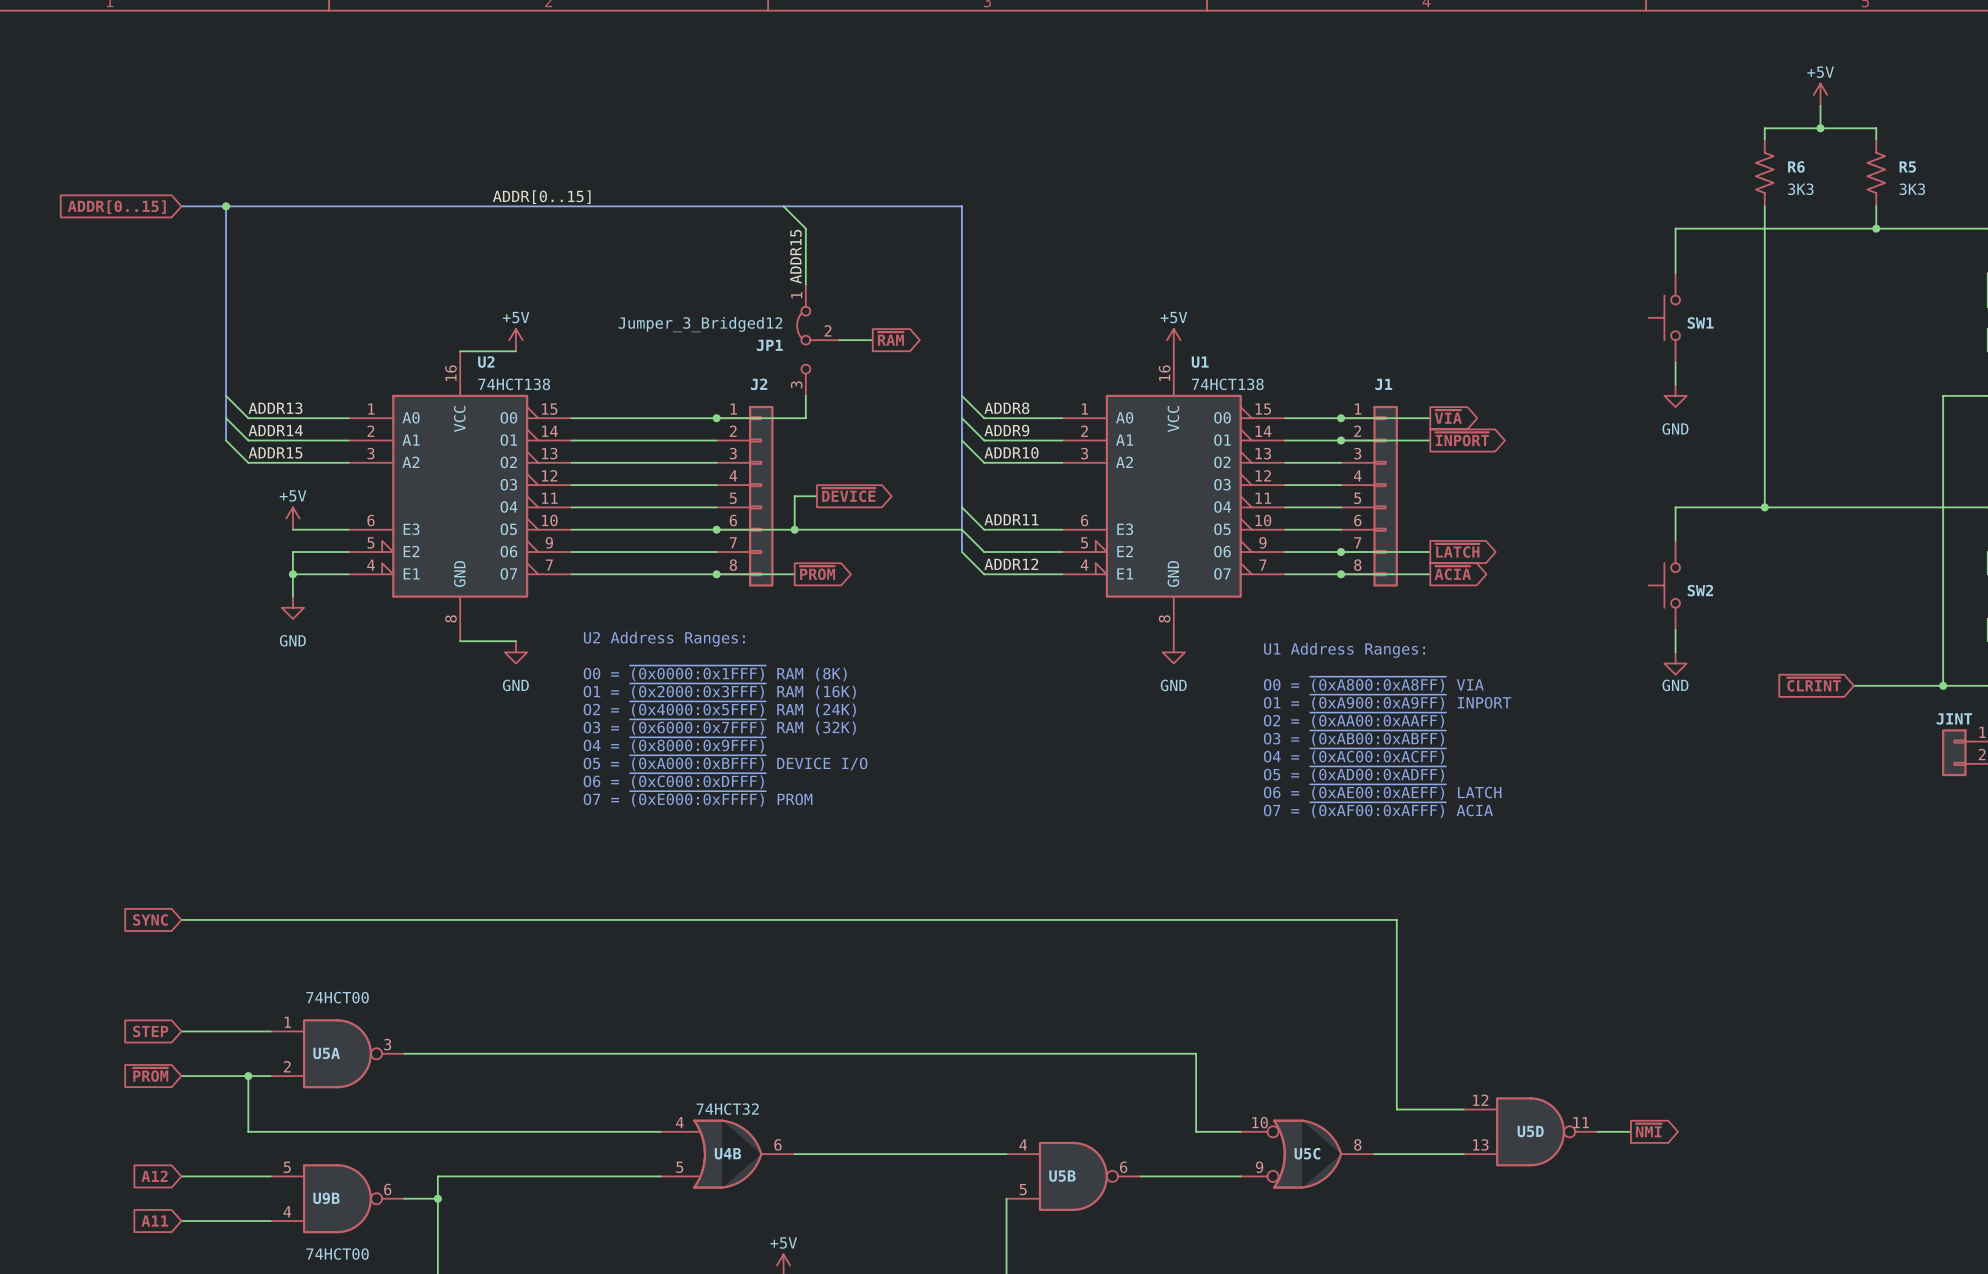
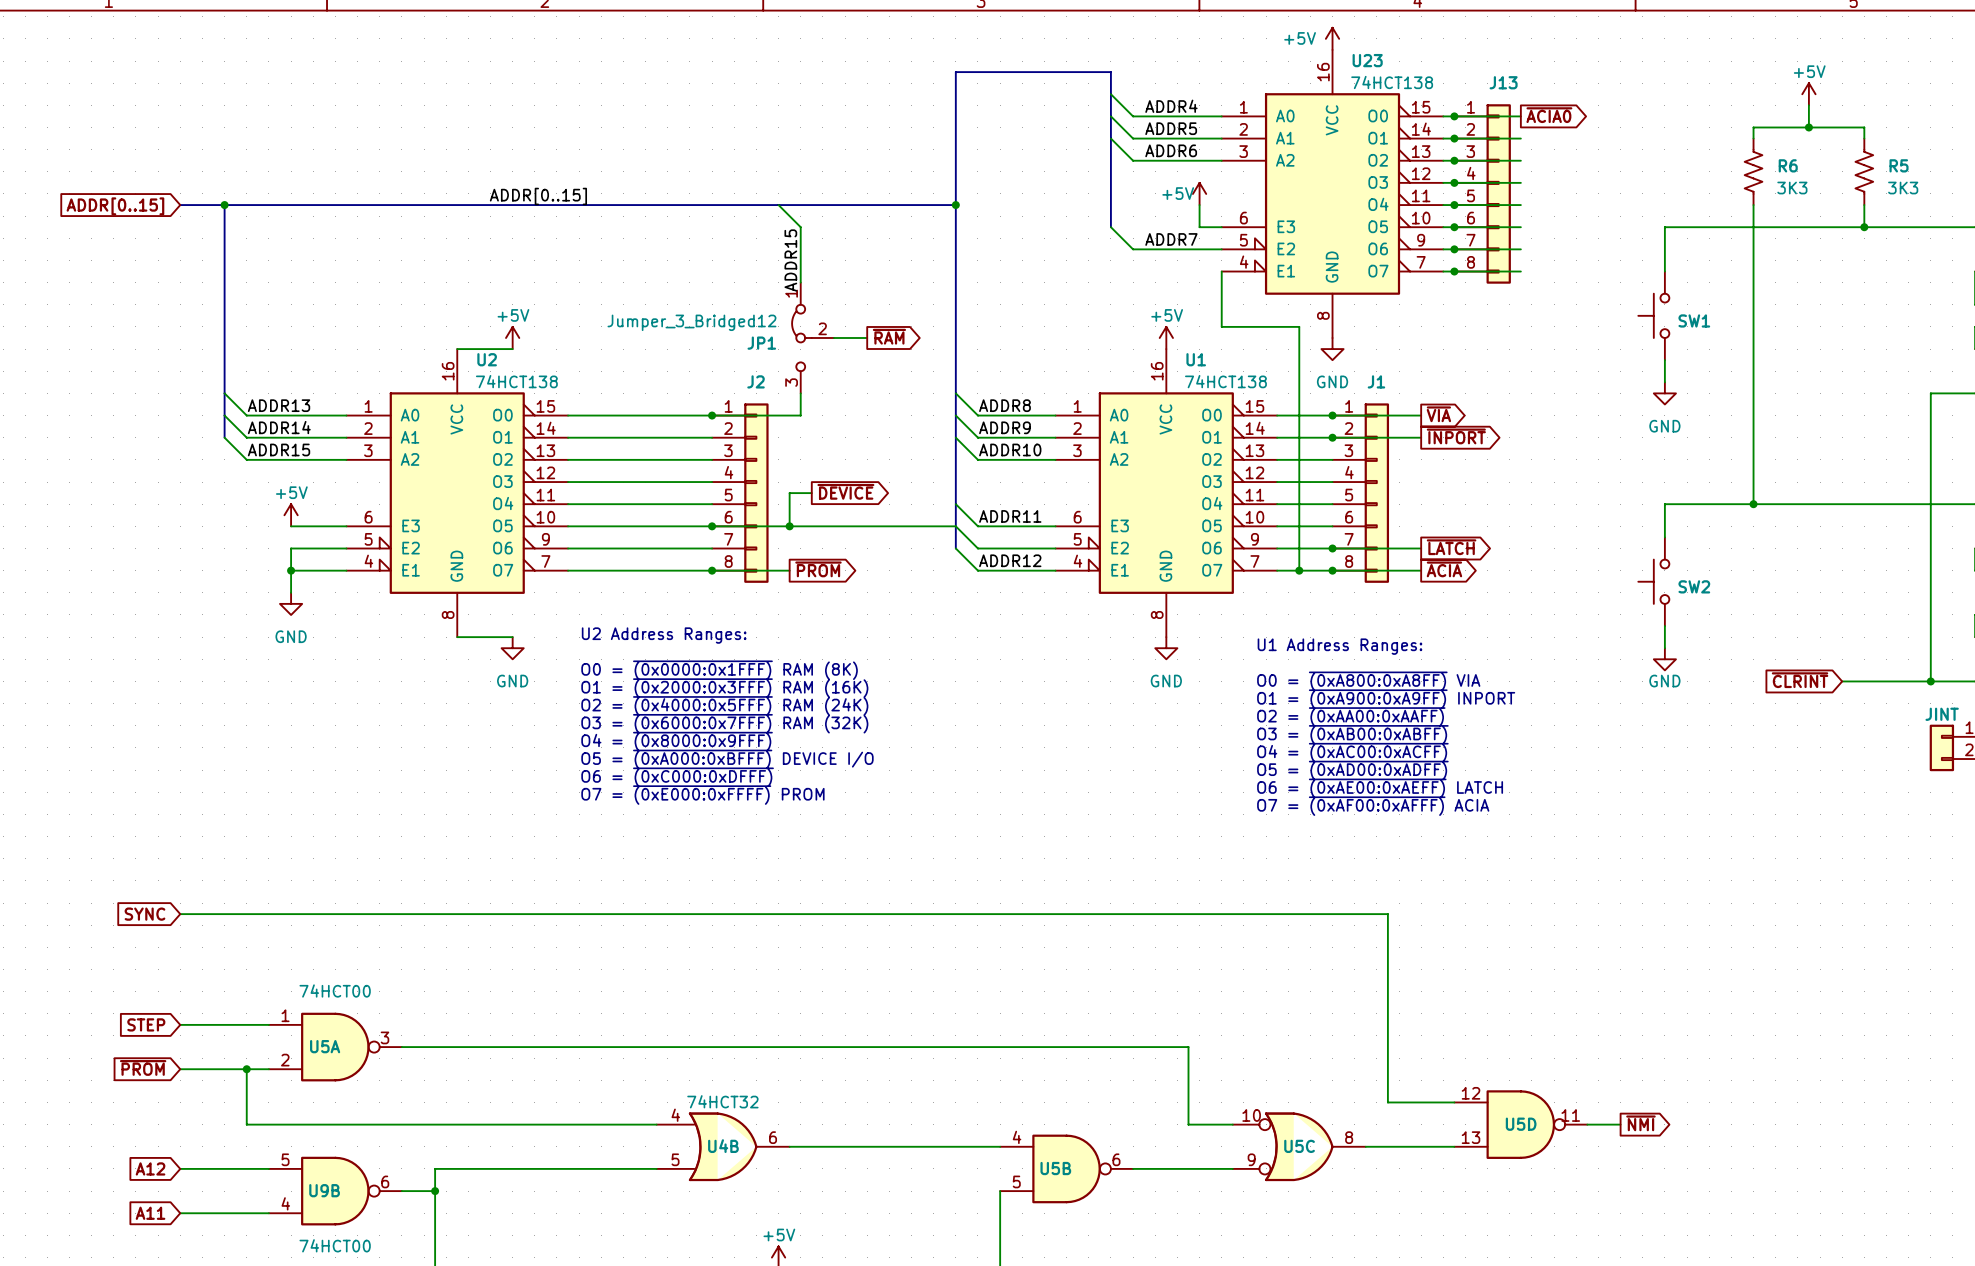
power symbol: none -> +5V (1332, 38)
wire: none -> (1110, 94) (1133, 116) (1221, 116)
label: none -> ADDR4 (1171, 106)
global label: none -> ~{ACIA0} (1549, 115)
wire: none -> (1110, 116) (1133, 138) (1221, 138)
wire: none -> (1443, 116) (1520, 116)
junction: none -> (1454, 116)
label: none -> ADDR5 (1171, 128)
wire: none -> (1110, 138) (1133, 160) (1221, 160)
wire: none -> (1443, 138) (1520, 138)
junction: none -> (1454, 138)
label: none -> ADDR6 (1171, 150)
wire: none -> (1443, 160) (1520, 160)
junction: none -> (1454, 160)
wire: none -> (1443, 182) (1520, 182)
junction: none -> (1454, 182)
power symbol: none -> +5V (1199, 193)
U23: none -> 74HCT138 (1332, 193)
J13: none -> (1482, 193)
bus: none -> (955, 205) (955, 72) (1110, 72) (1110, 227)
junction: none -> (955, 205)
wire: none -> (1199, 205) (1199, 227) (1221, 227)
wire: none -> (1443, 205) (1520, 205)
junction: none -> (1454, 205)
wire: none -> (1110, 227) (1133, 249) (1221, 249)
wire: none -> (1443, 227) (1520, 227)
junction: none -> (1454, 227)
label: none -> ADDR7 (1171, 239)
wire: none -> (1443, 249) (1520, 249)
junction: none -> (1454, 249)
wire: none -> (1221, 271) (1221, 326) (1299, 326) (1299, 570)
wire: none -> (1443, 271) (1520, 271)
junction: none -> (1454, 271)
power symbol: none -> GND (1332, 349)
junction: none -> (1299, 570)

